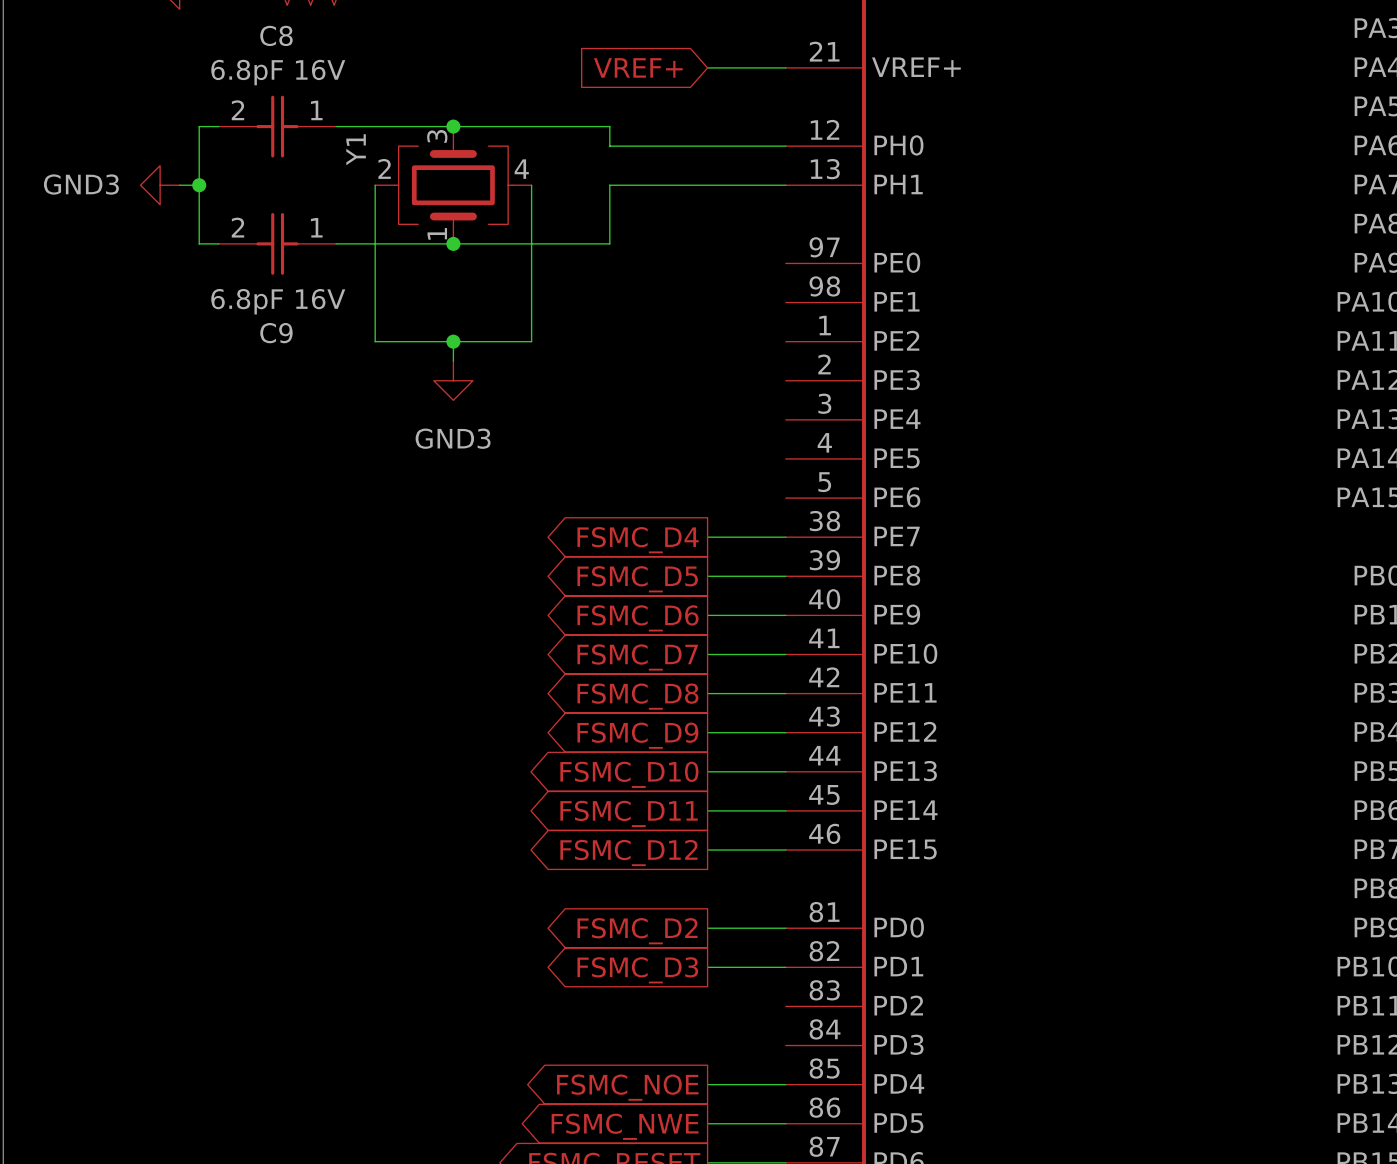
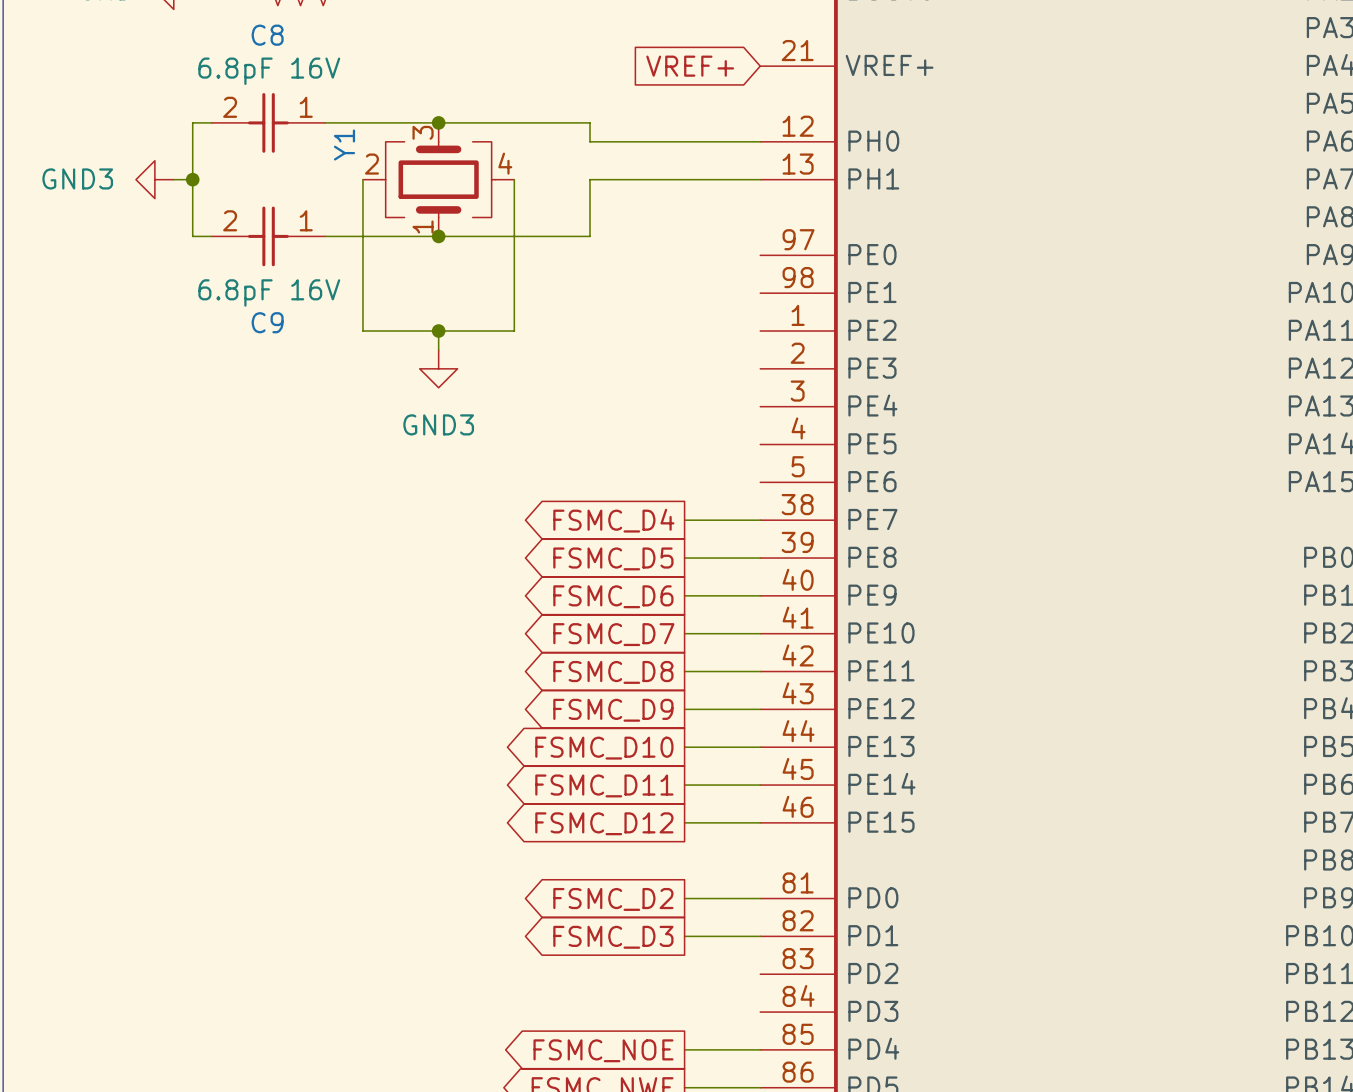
global label position: VREF+ (638, 67) -> VREF+ (690, 66)
wire: (707, 67) (785, 67) -> none

